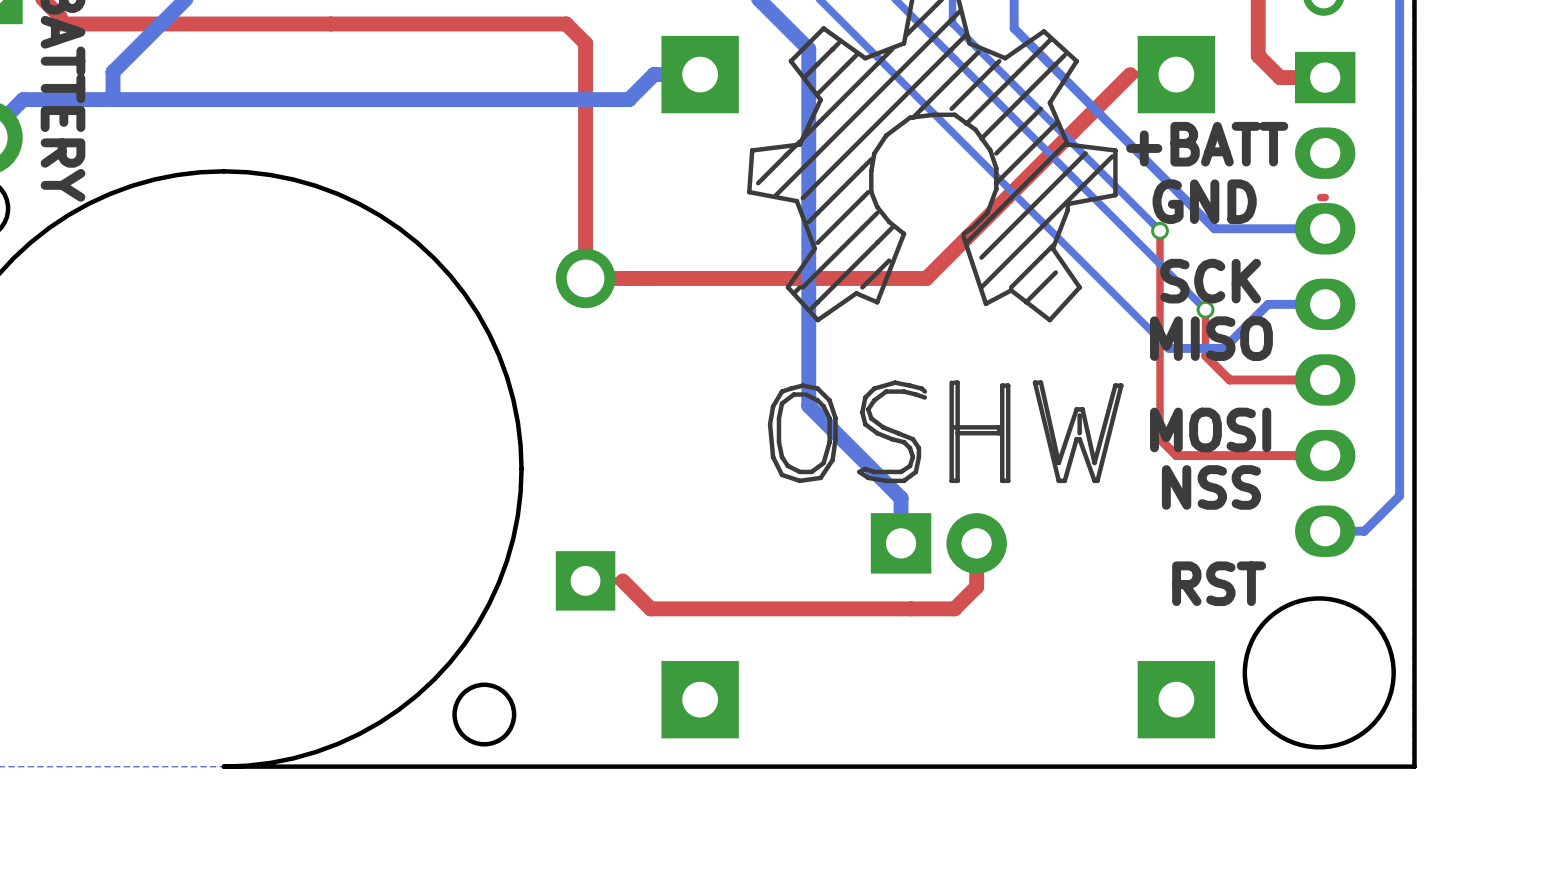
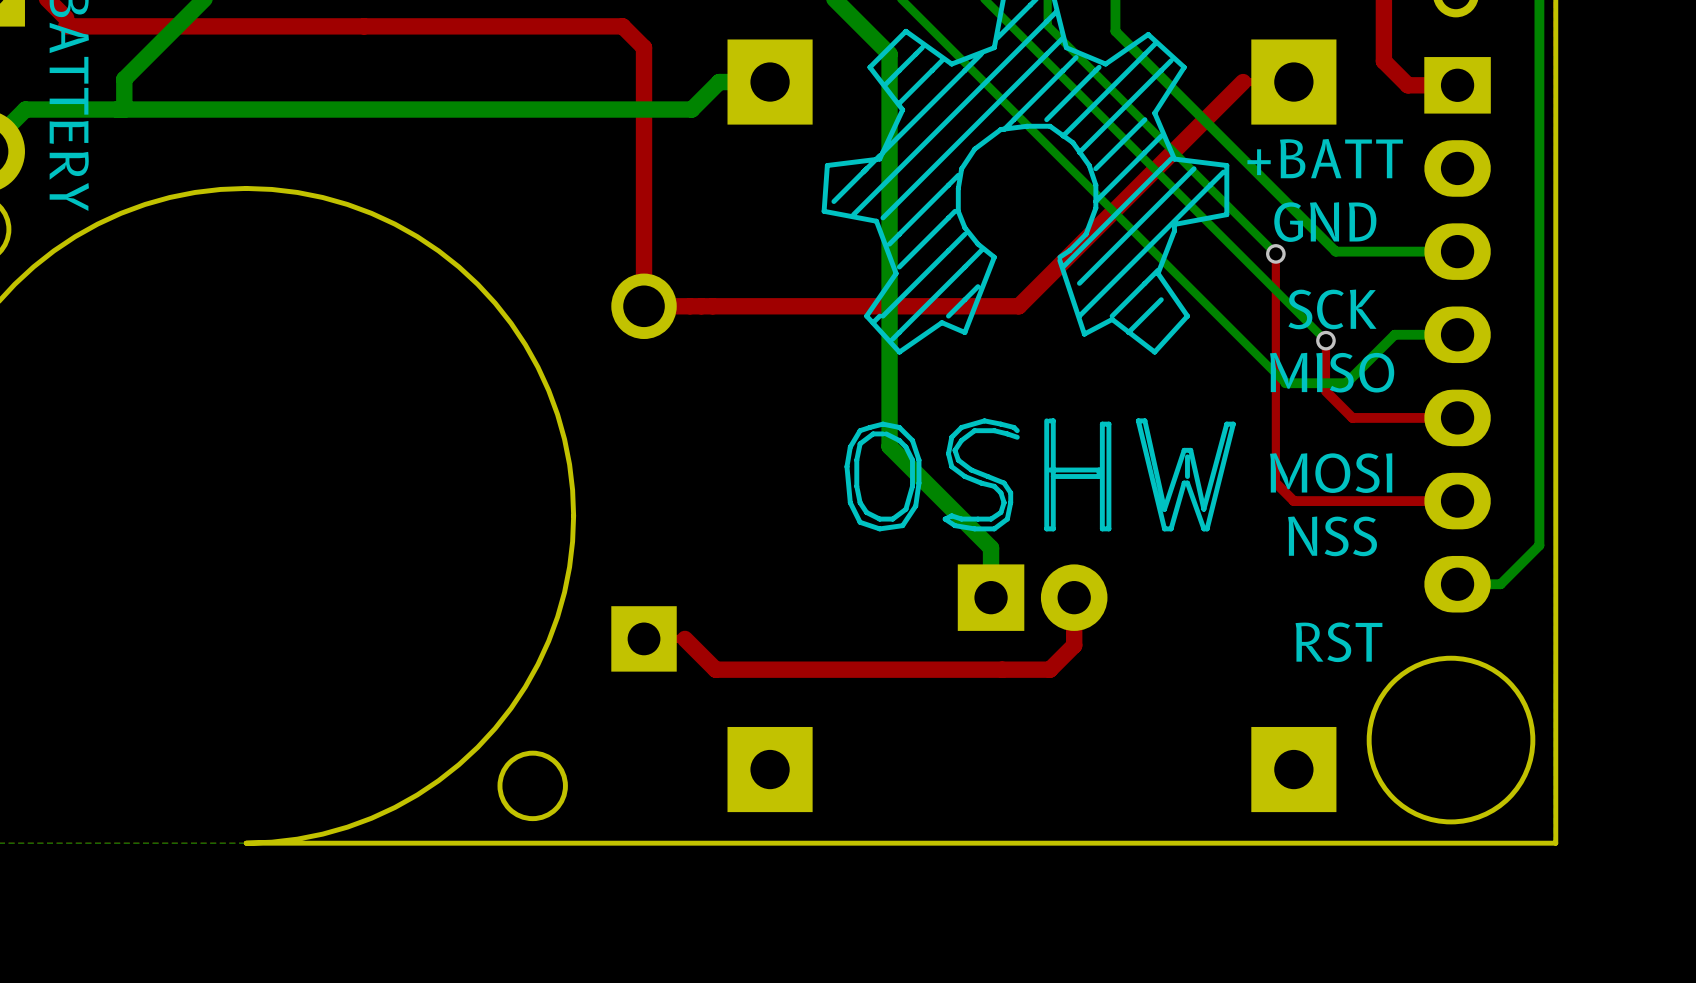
top track: (1325, 197) (1320, 197) -> none

